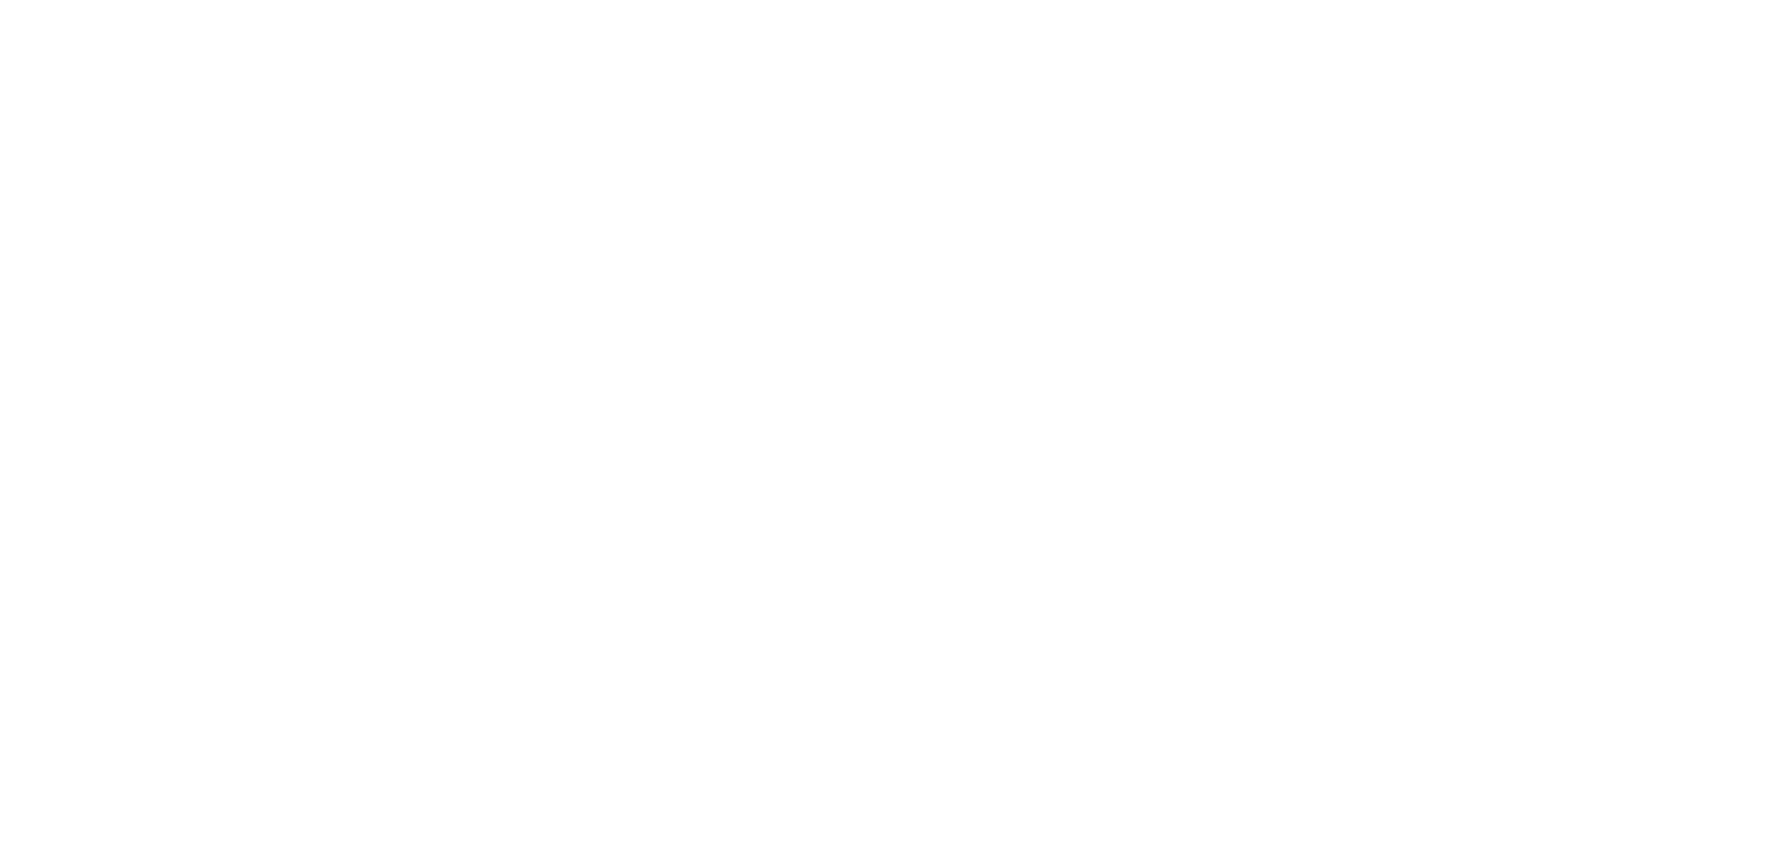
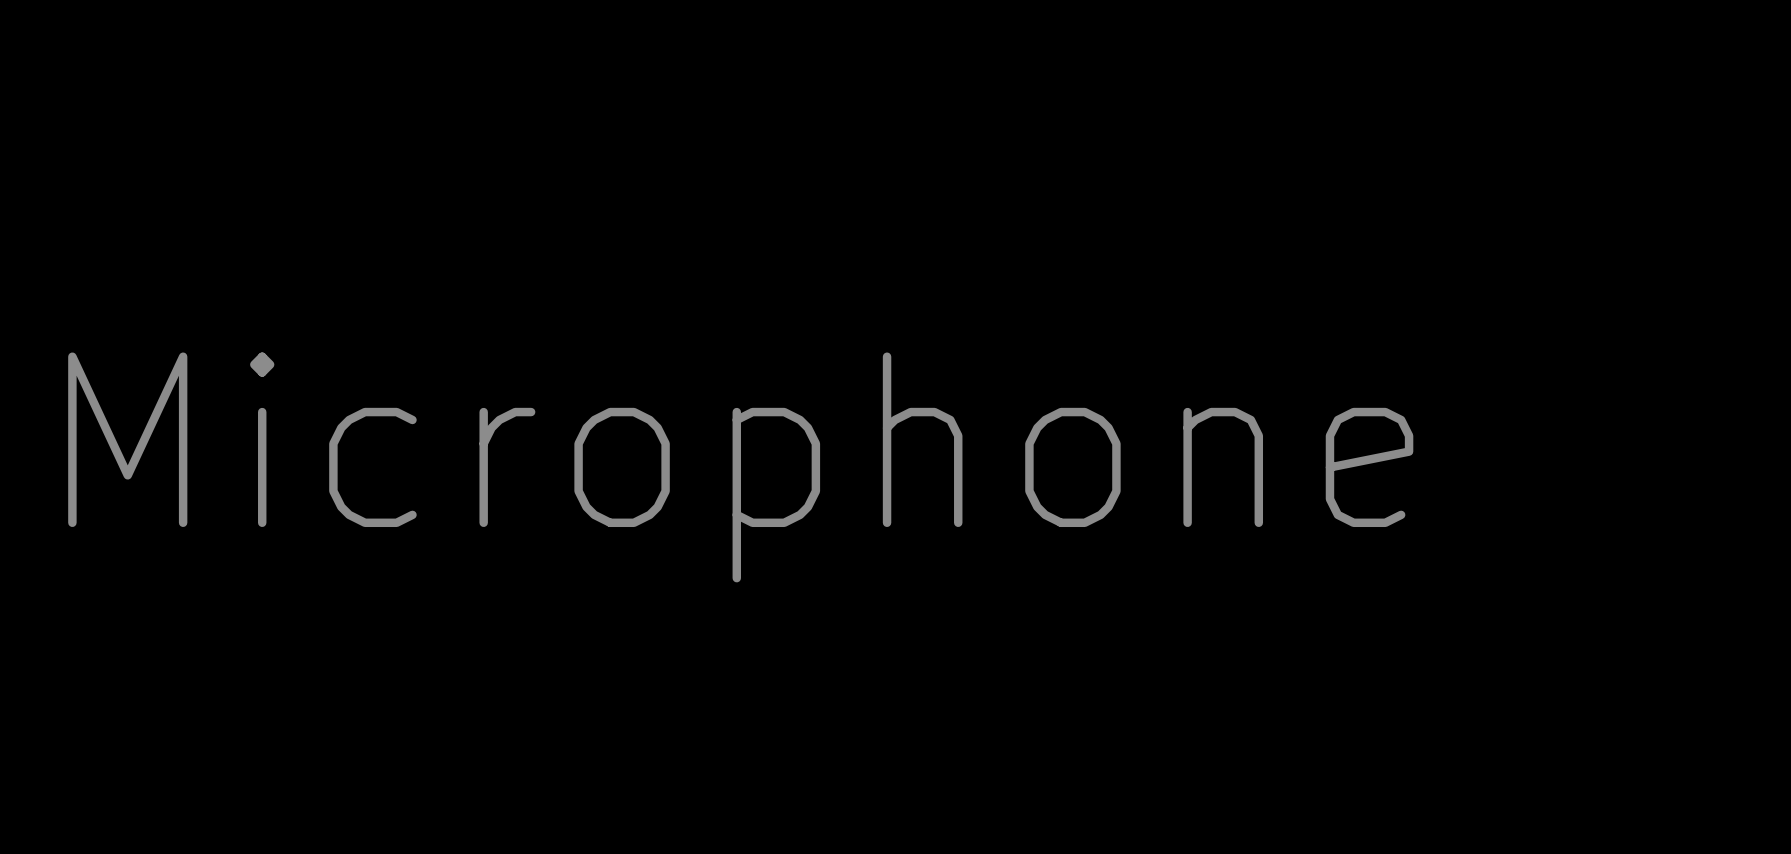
text: none -> Microphone (740, 467)

